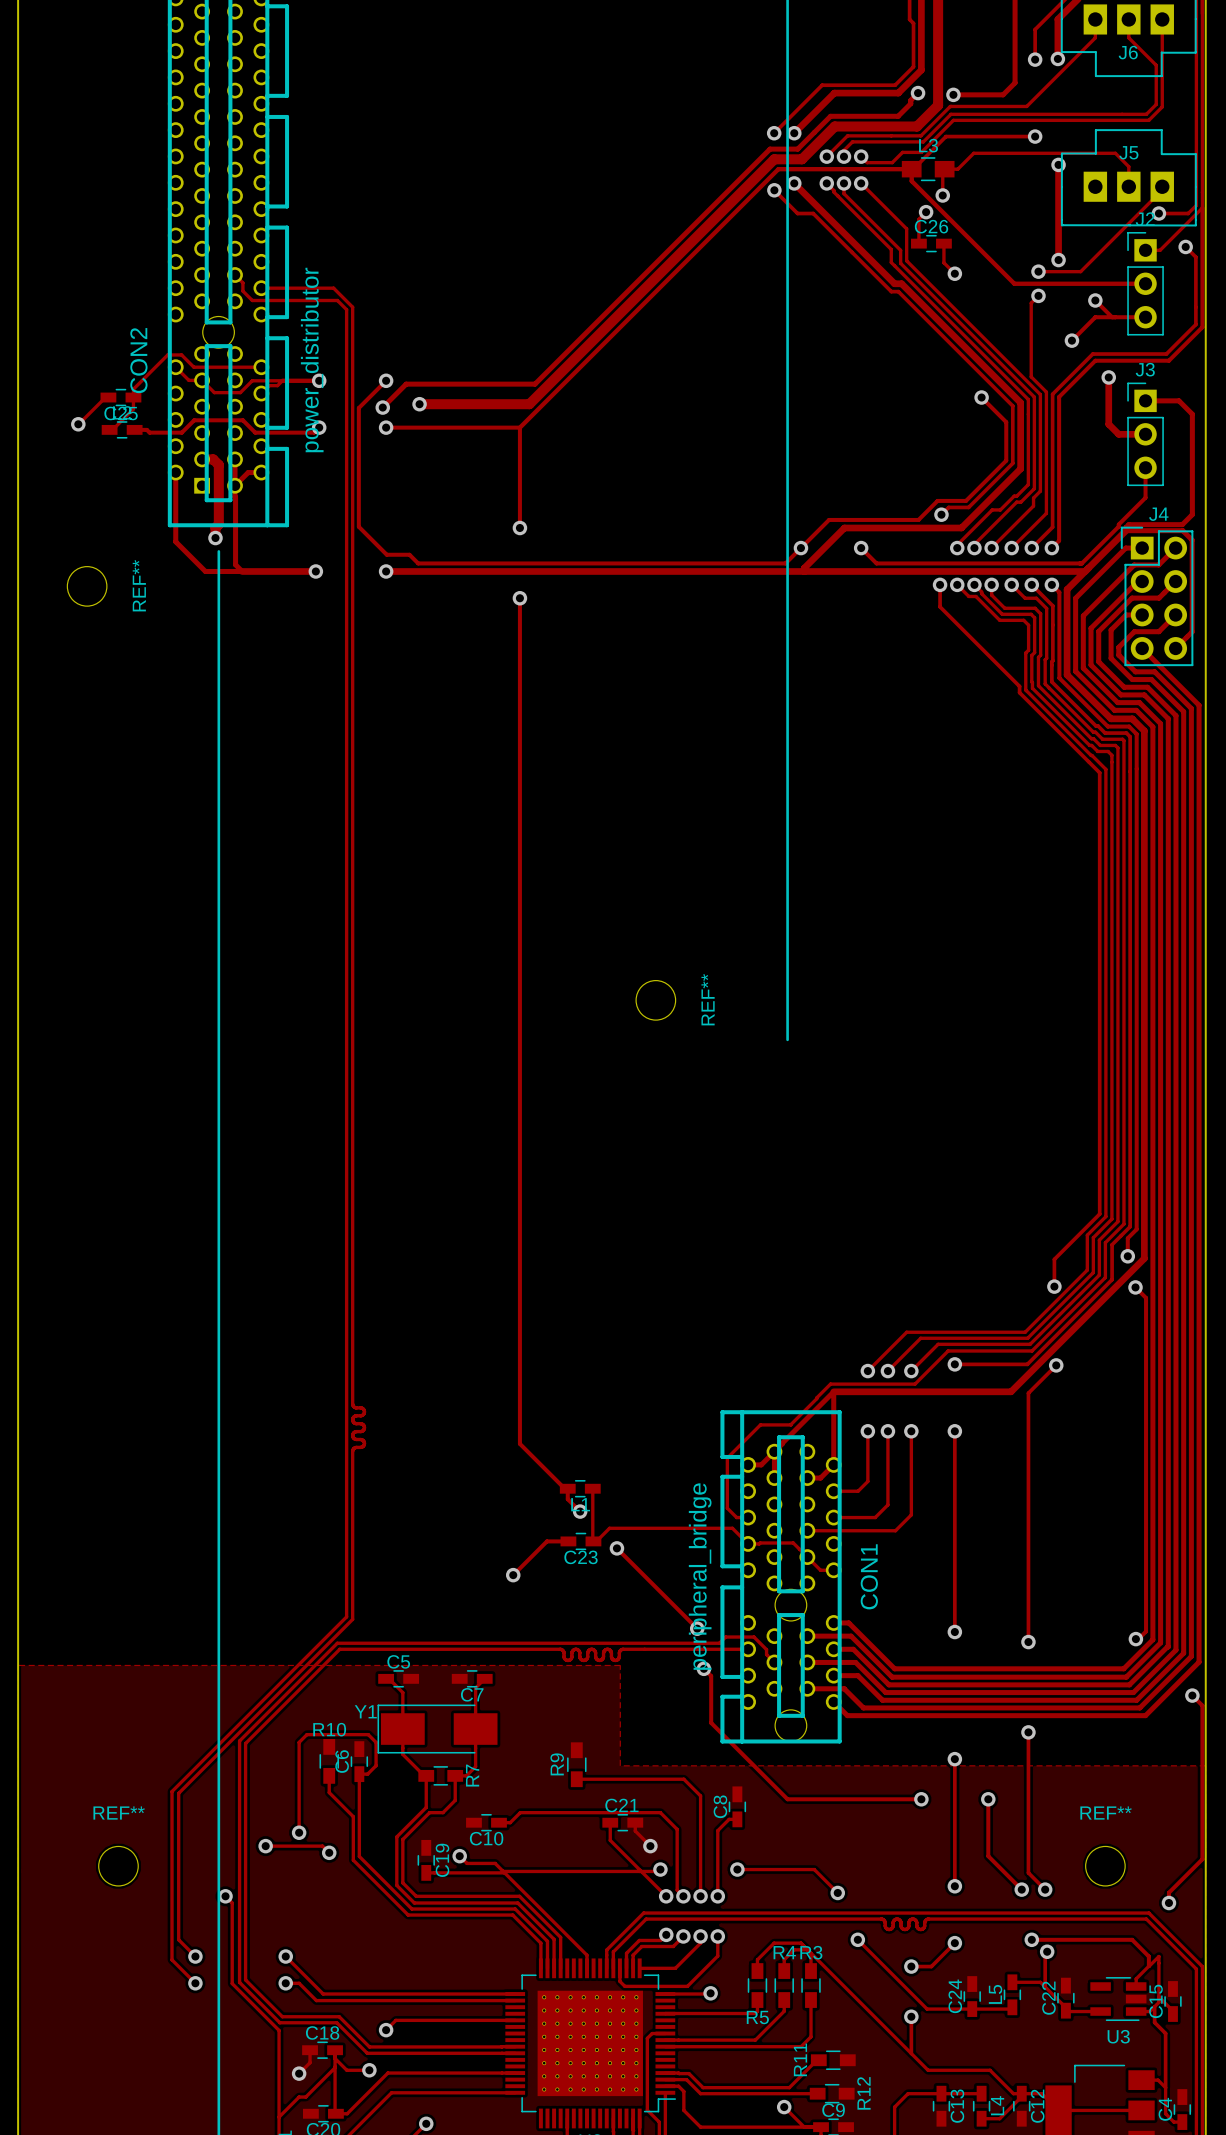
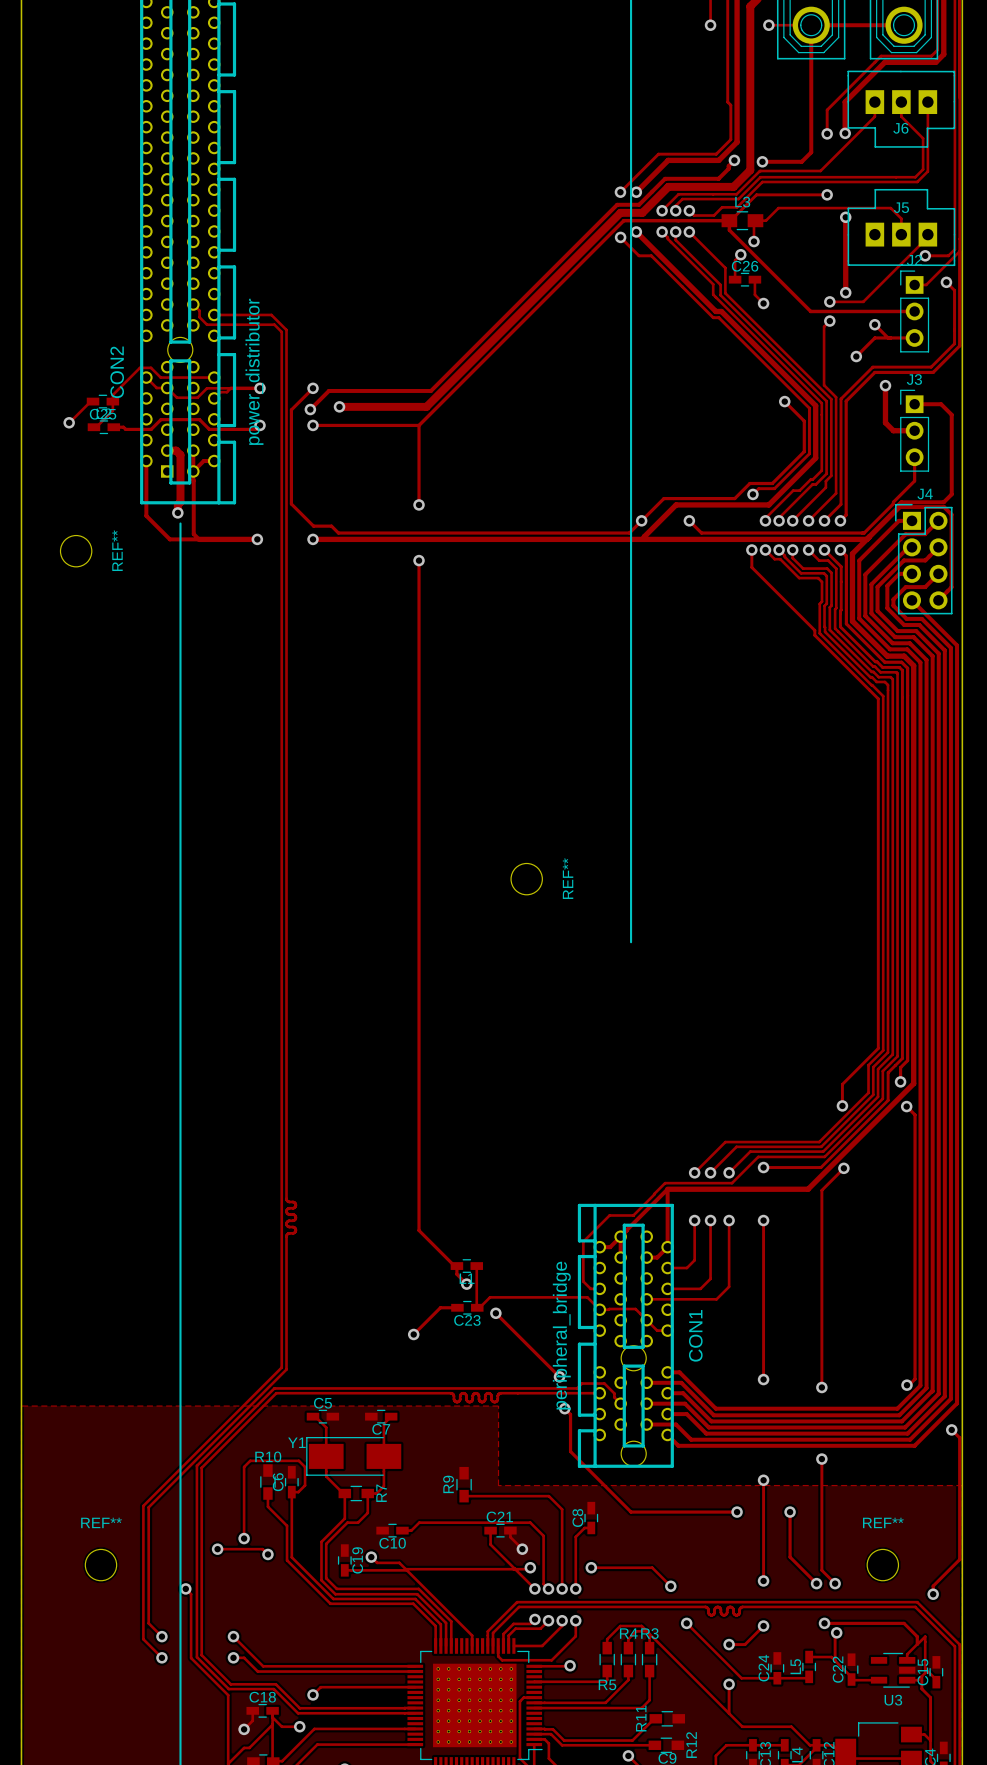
line: none -> (631, 910) (631, 942)

